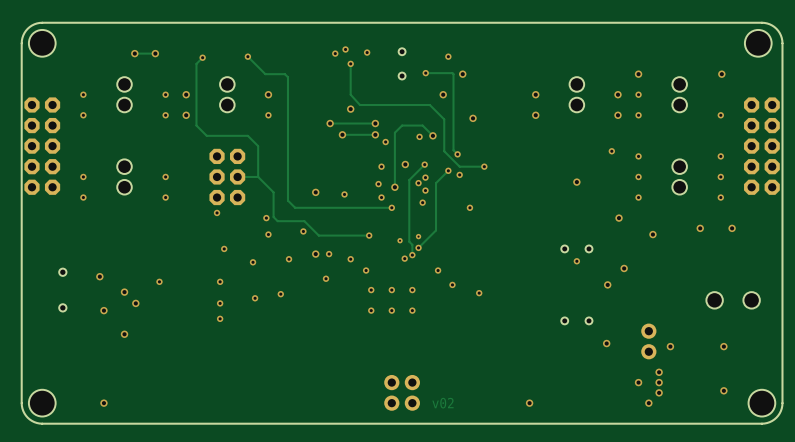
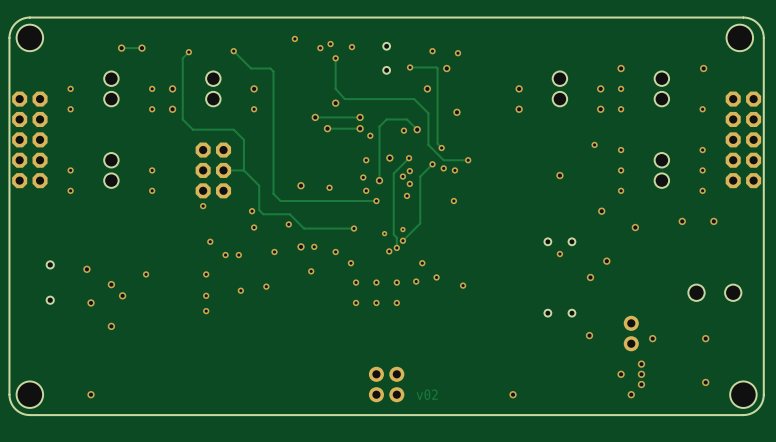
via: none -> (294, 38)
via: none -> (457, 53)
via: none -> (454, 170)
via: none -> (225, 255)
via: none -> (416, 281)

